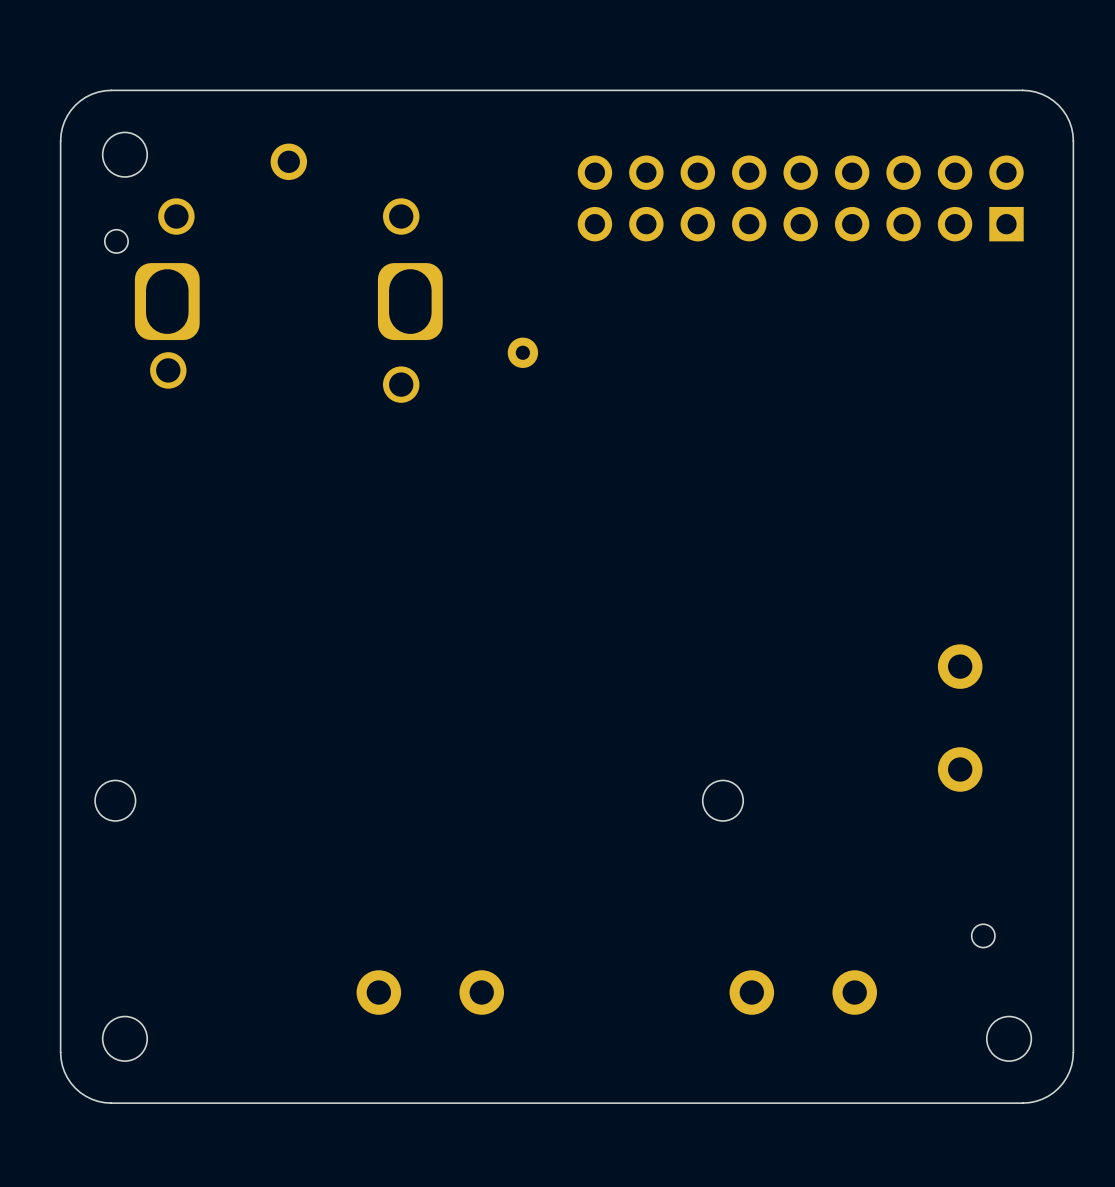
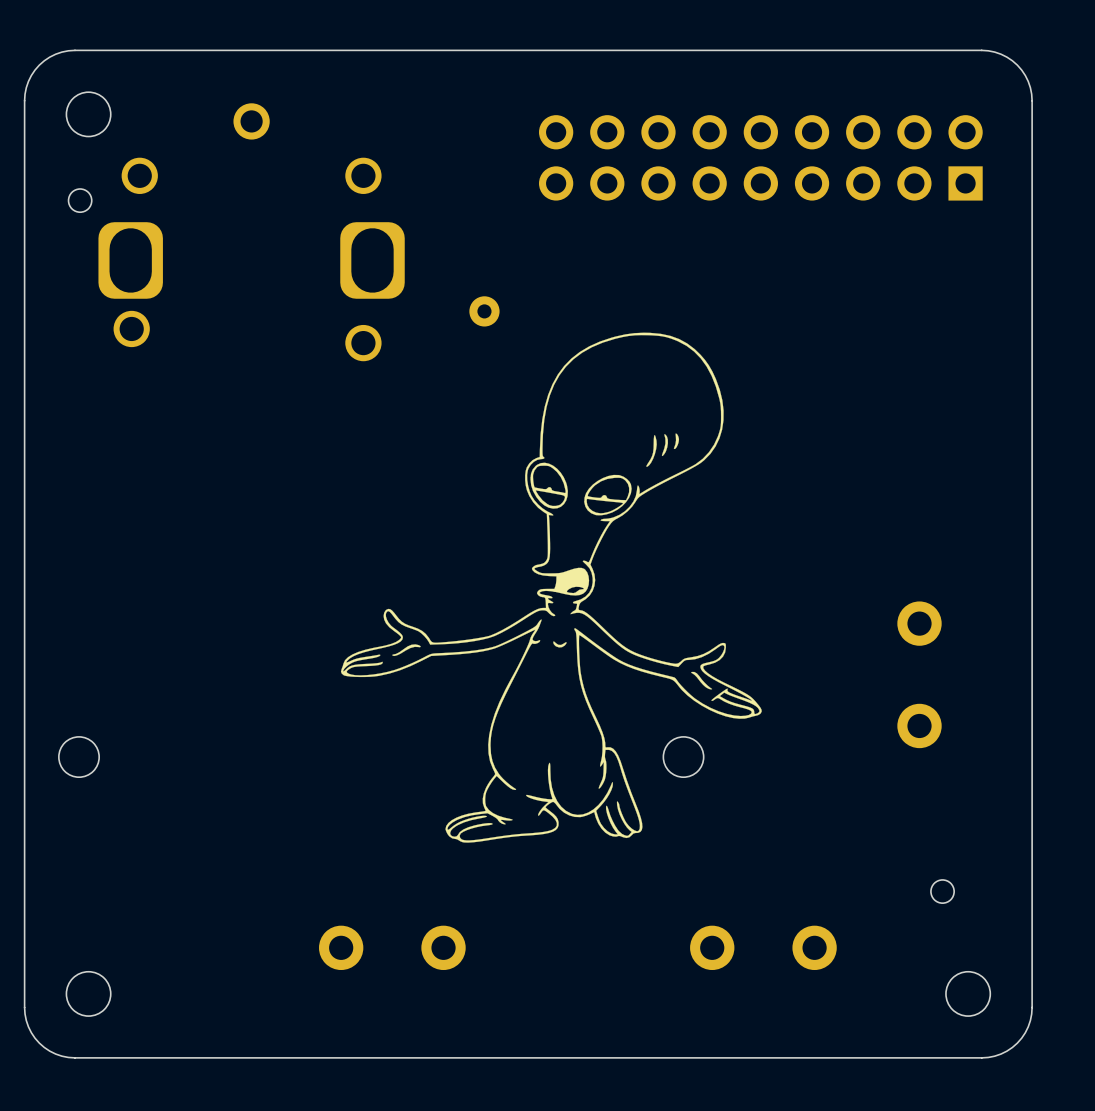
drawing: none -> [340, 332, 762, 843]

